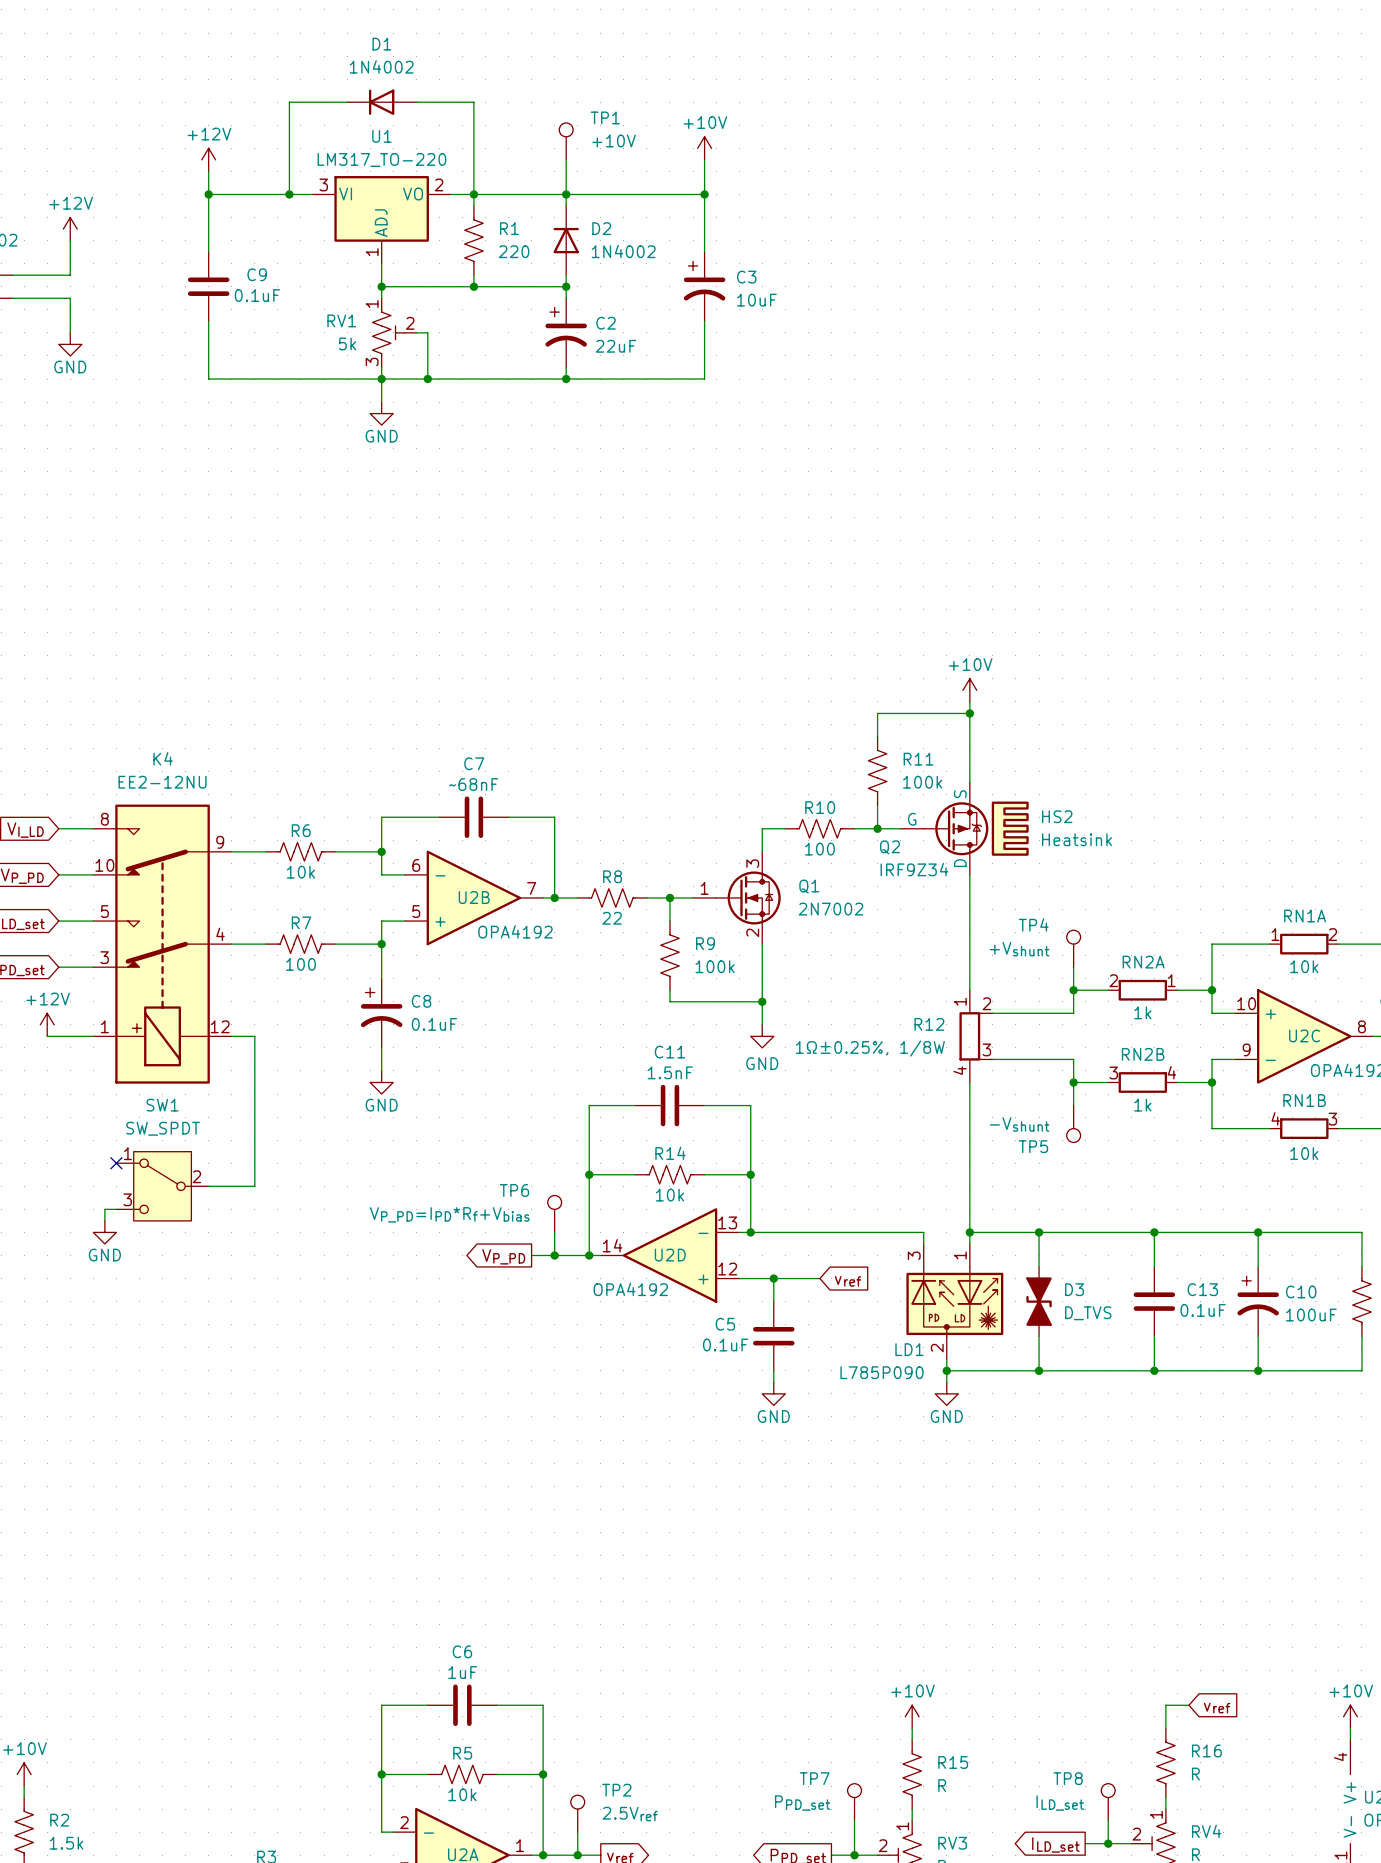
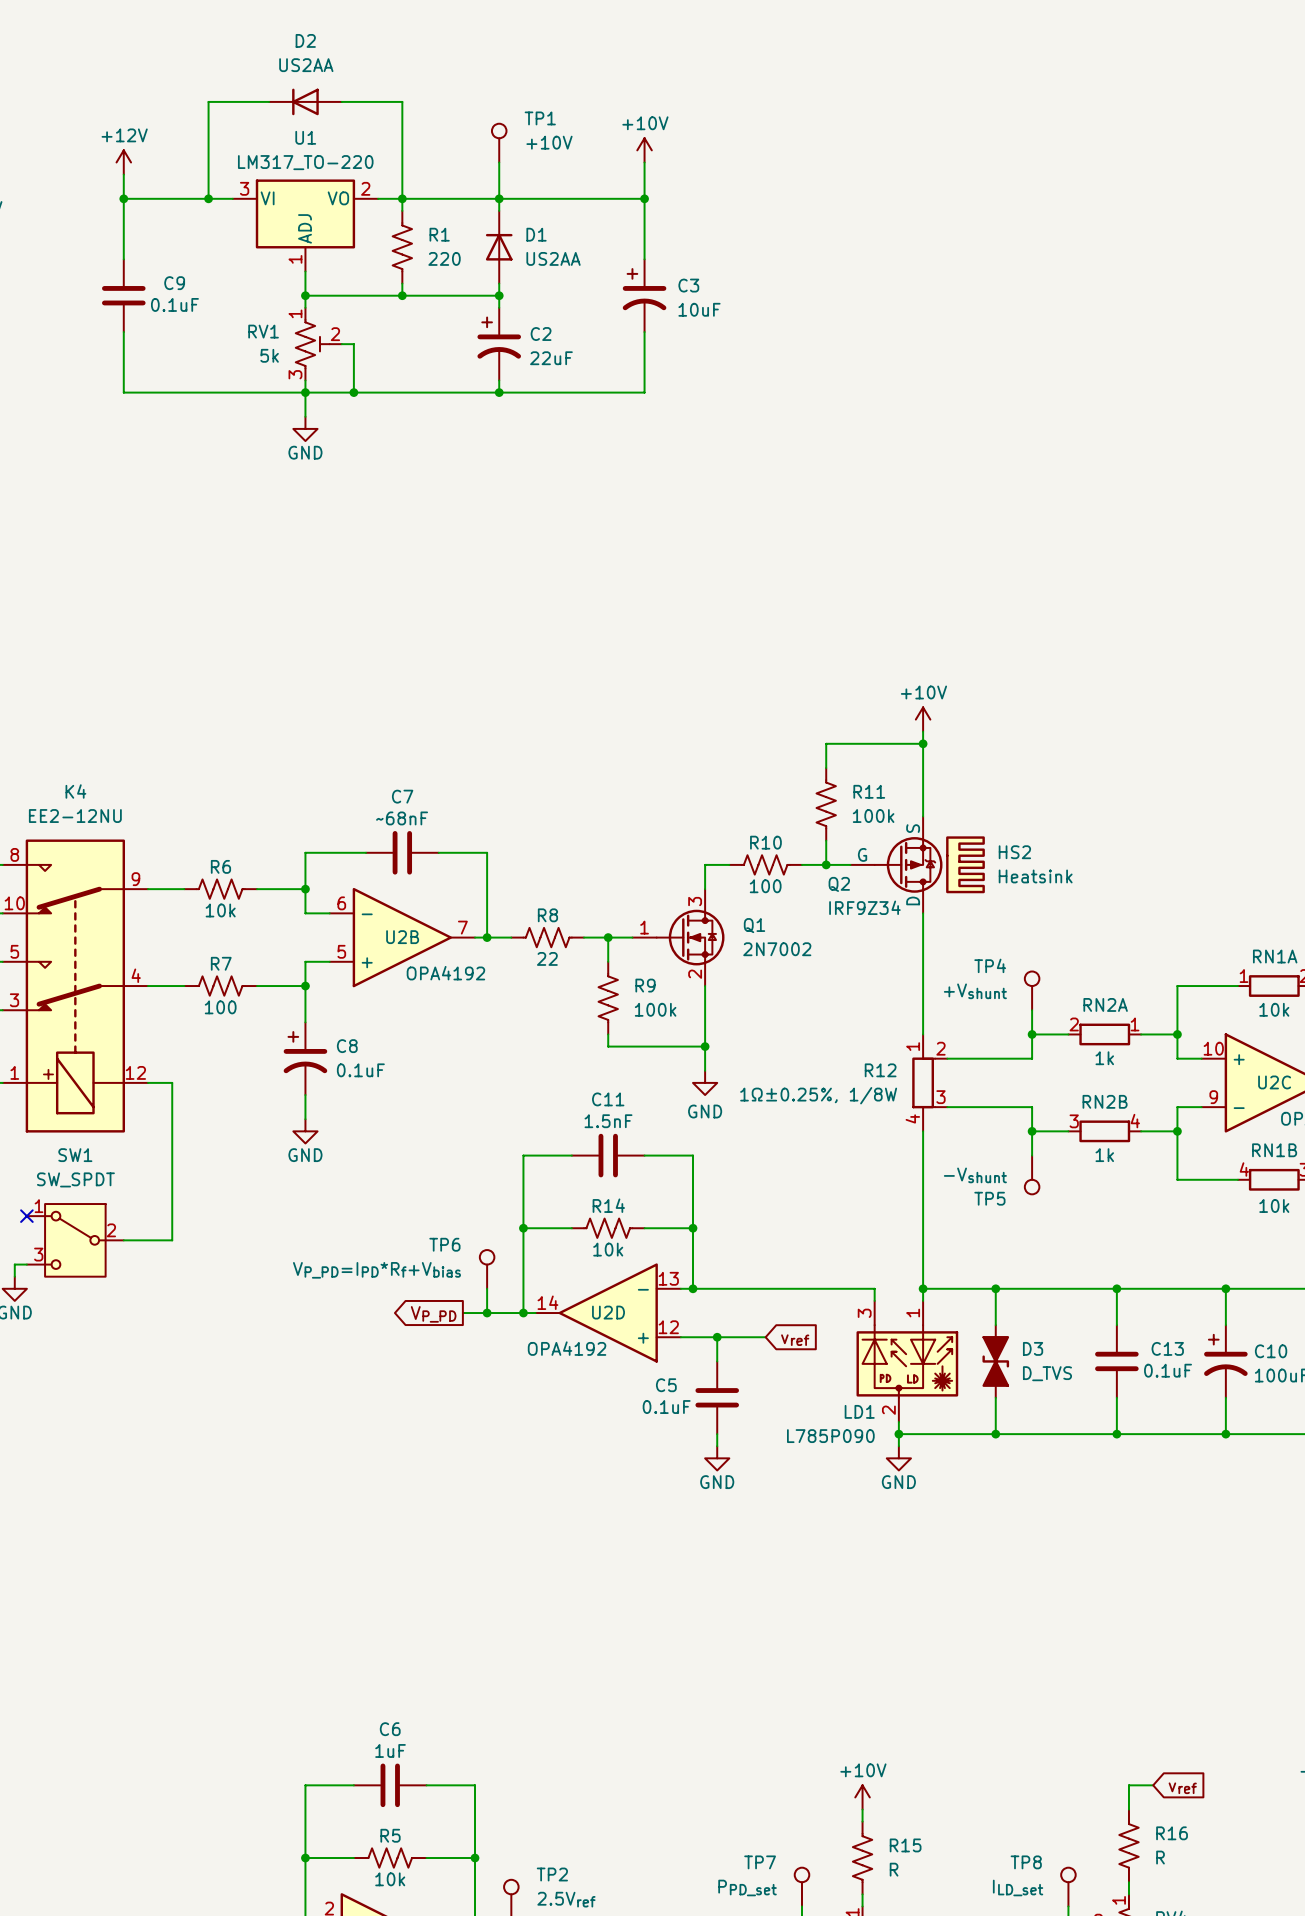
D1 name: D1 (381, 44) -> D2 (305, 40)
D1 value: 1N4002 (381, 66) -> US2AA (306, 65)
D2 name: D2 (601, 228) -> D1 (536, 234)
D2 value: 1N4002 (623, 251) -> US2AA (553, 258)

